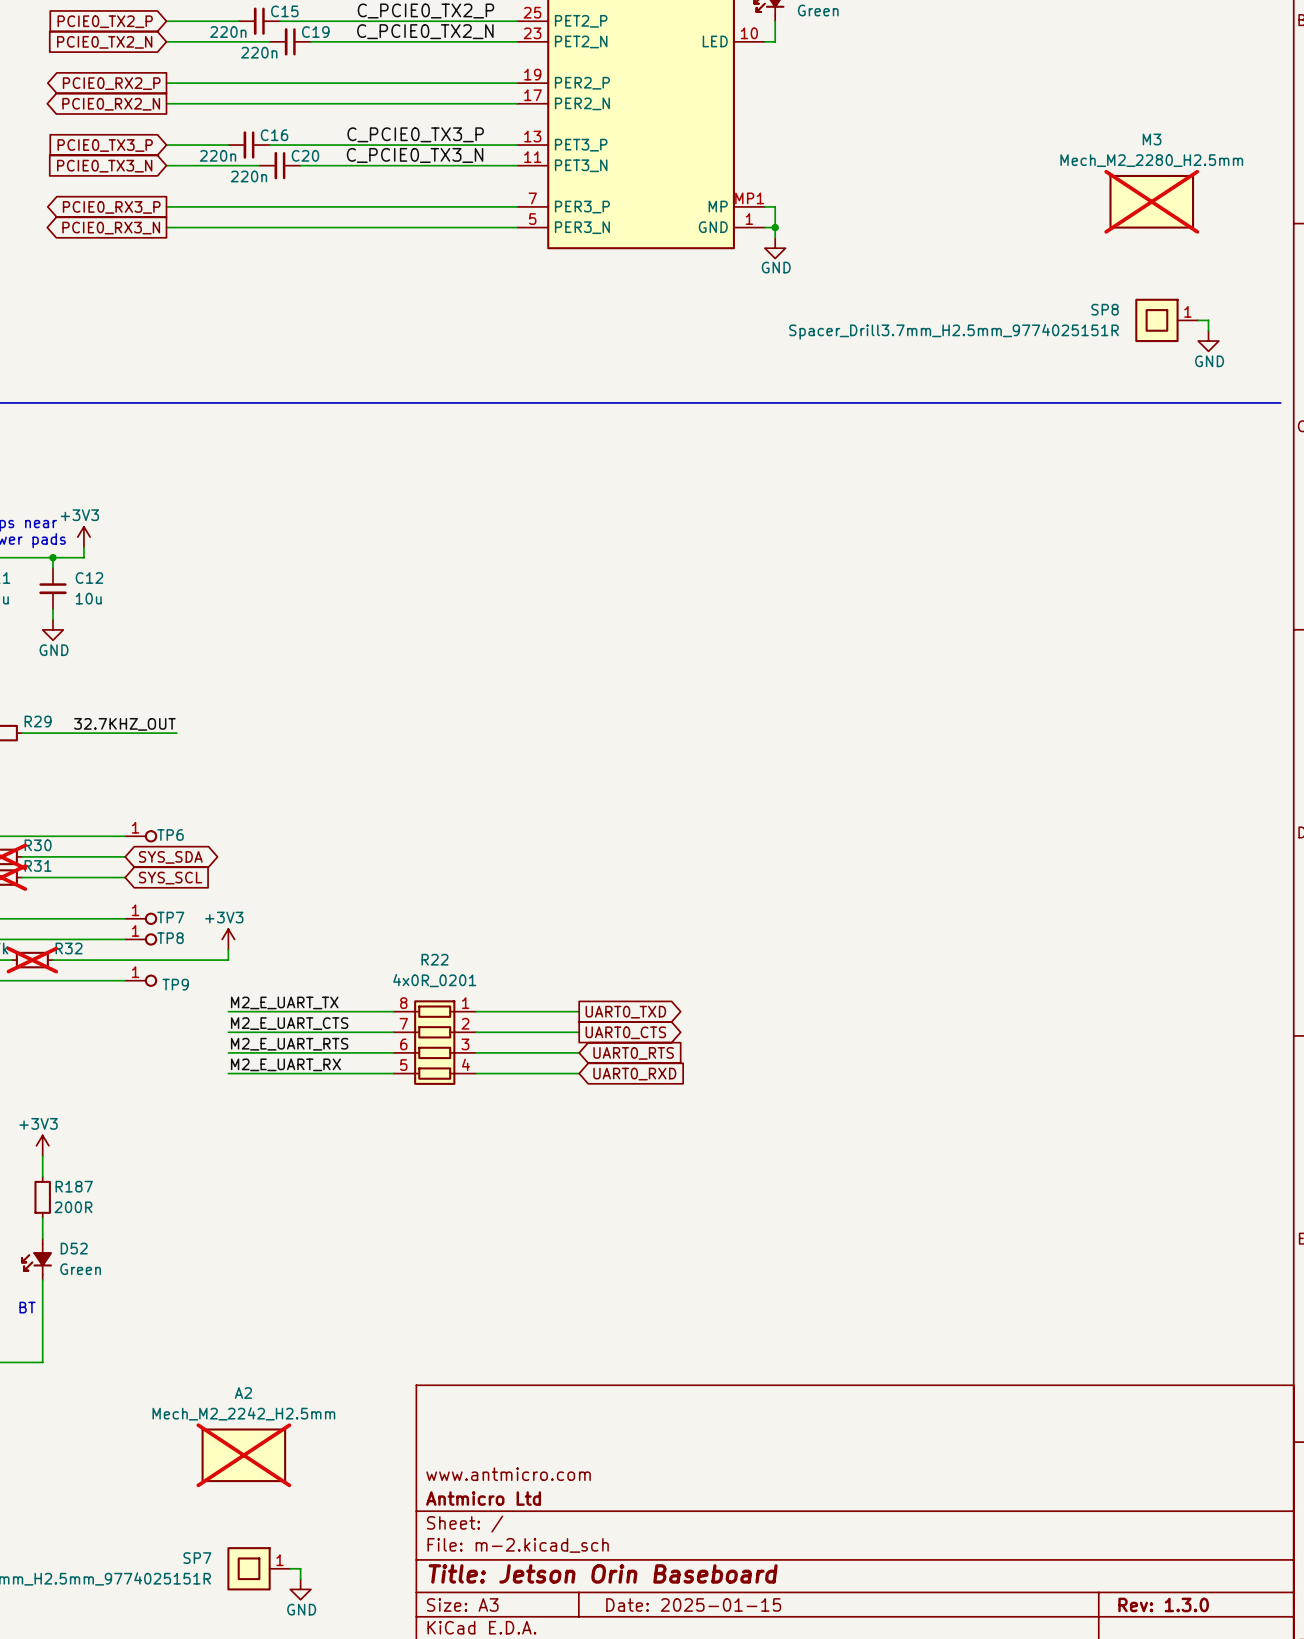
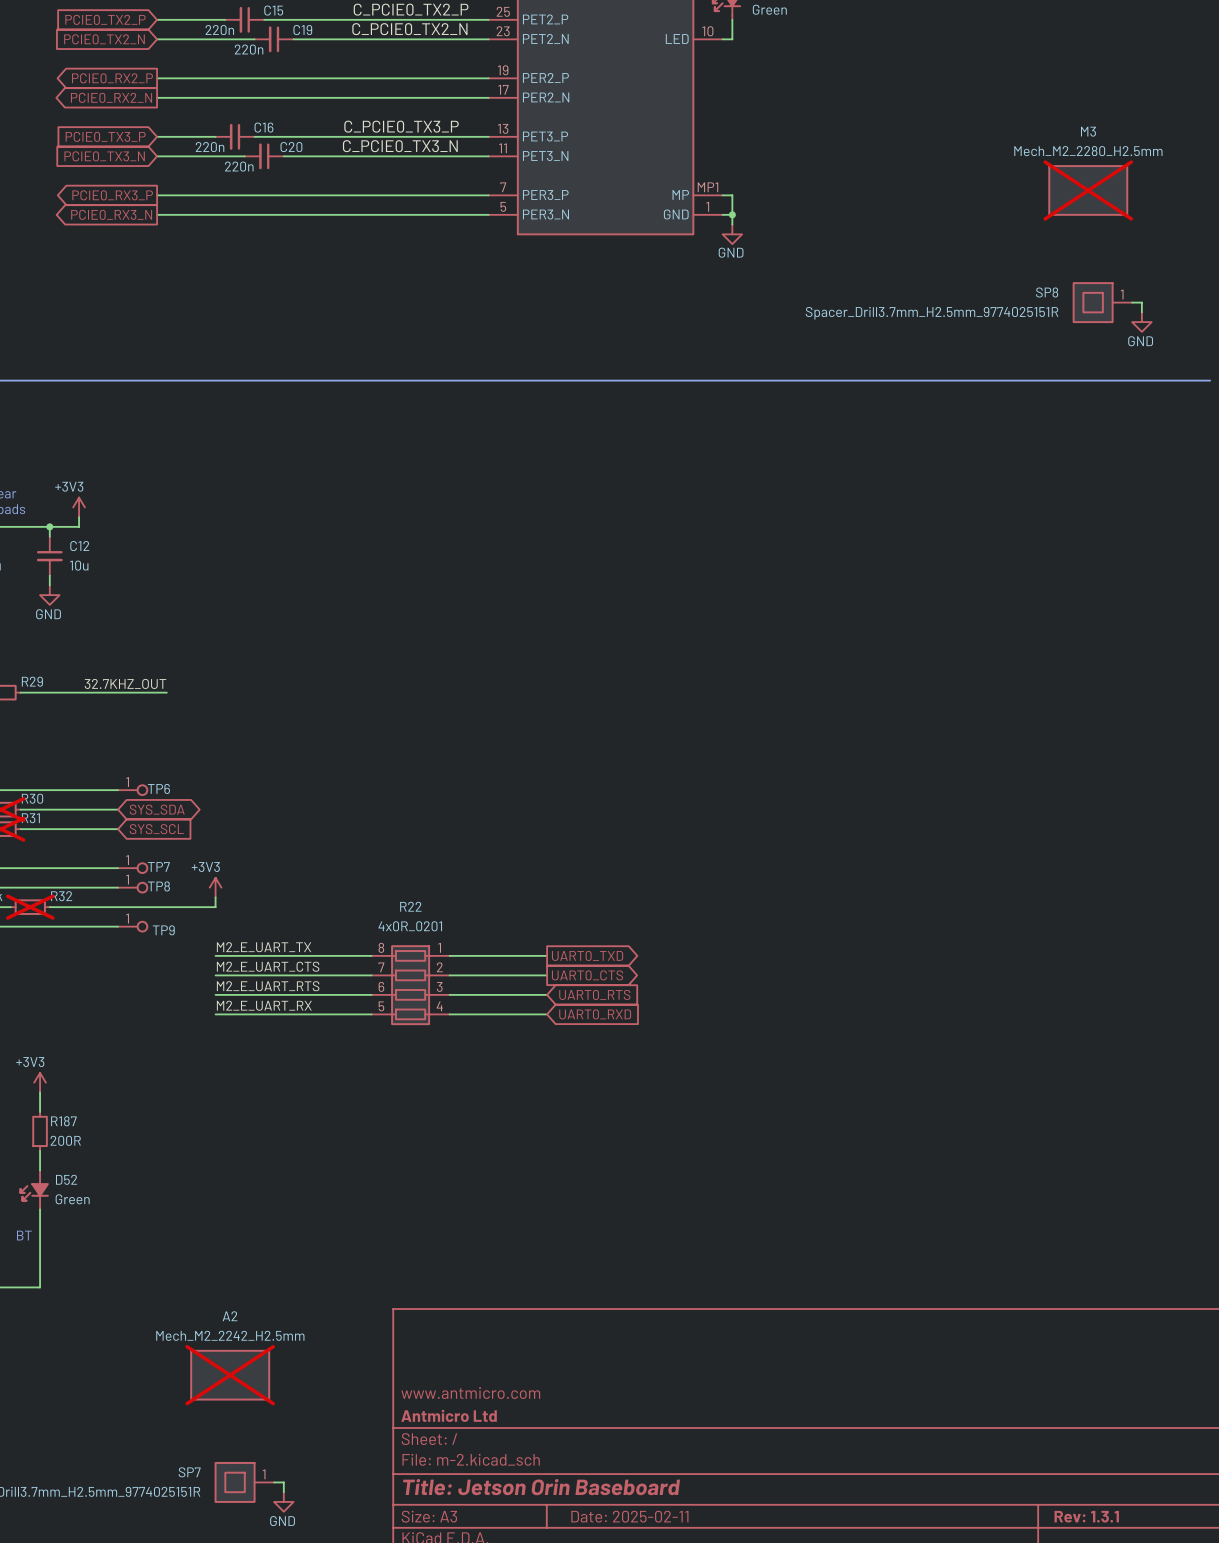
title block: Date: 2025-01-15 (693, 1604) -> Date: 2025-02-11 (629, 1516)
title block: Rev: 1.3.0 (1163, 1604) -> Rev: 1.3.1 (1086, 1516)

